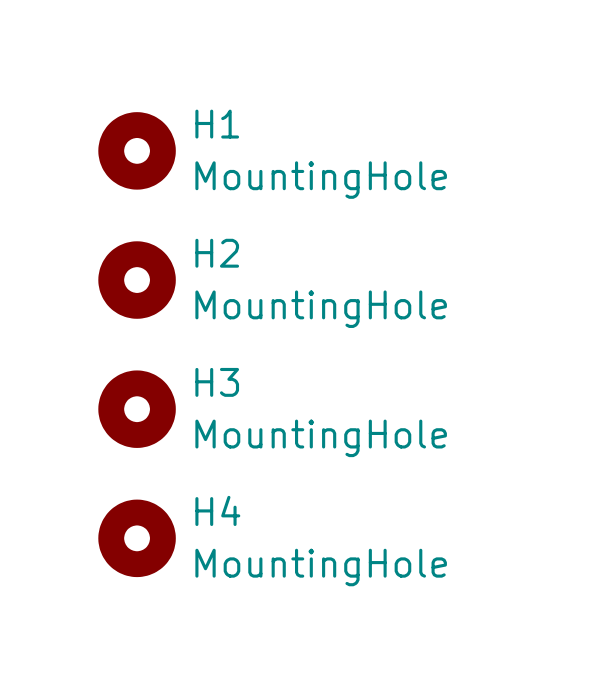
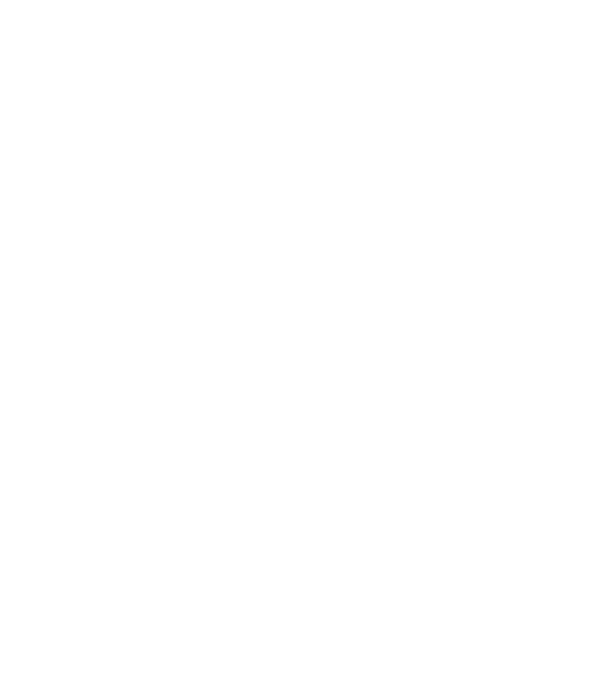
H1: MountingHole (137, 150) -> none
H2: MountingHole (137, 280) -> none
H3: MountingHole (137, 409) -> none
H4: MountingHole (137, 538) -> none

